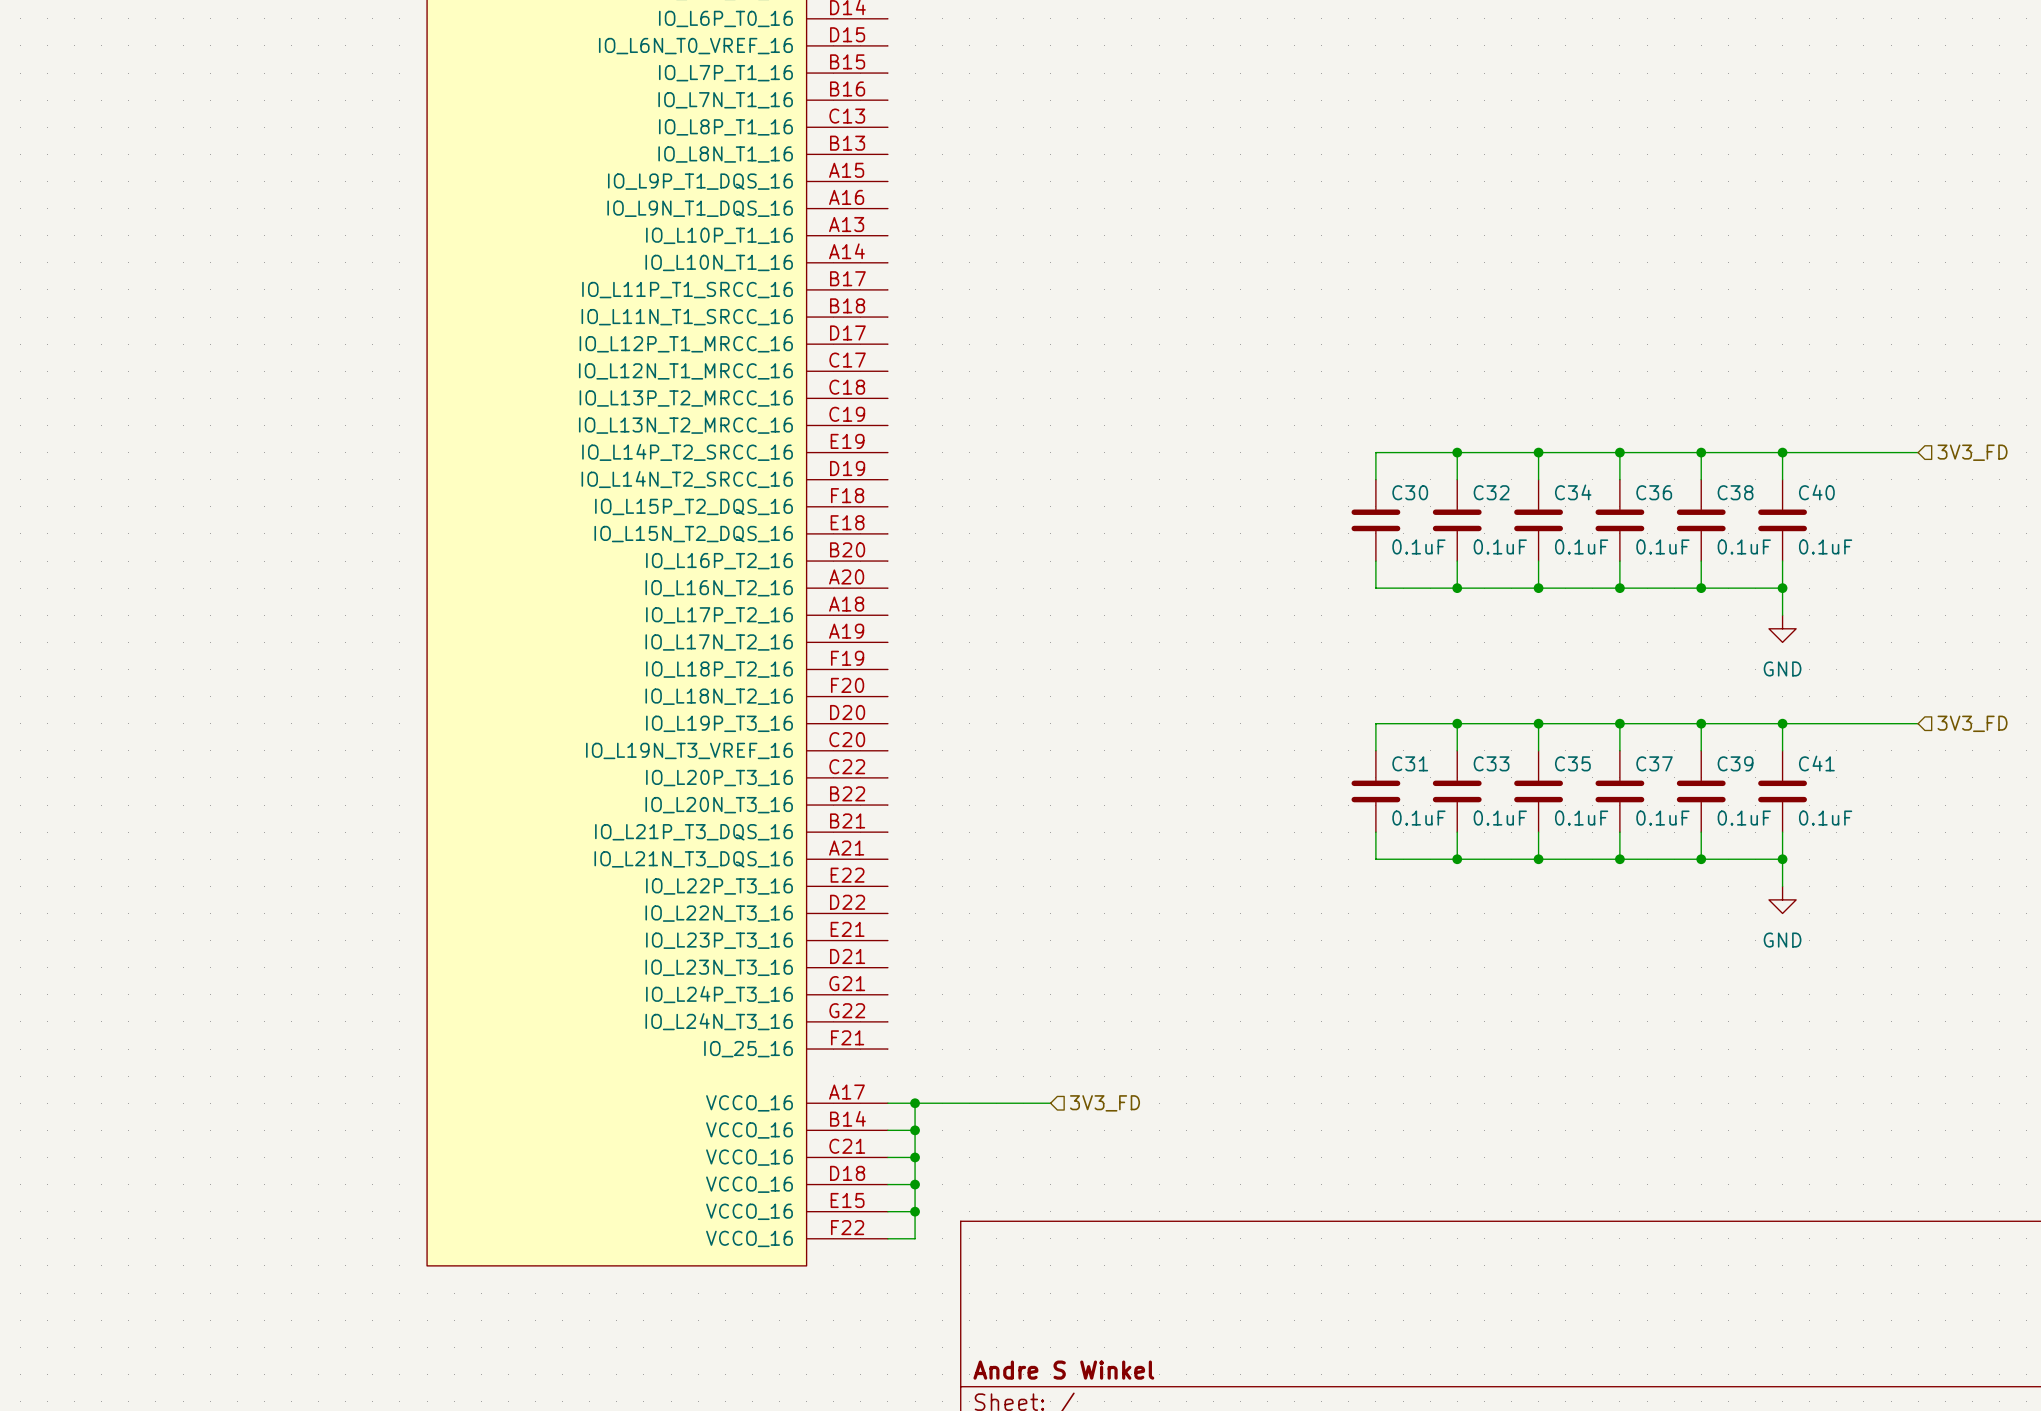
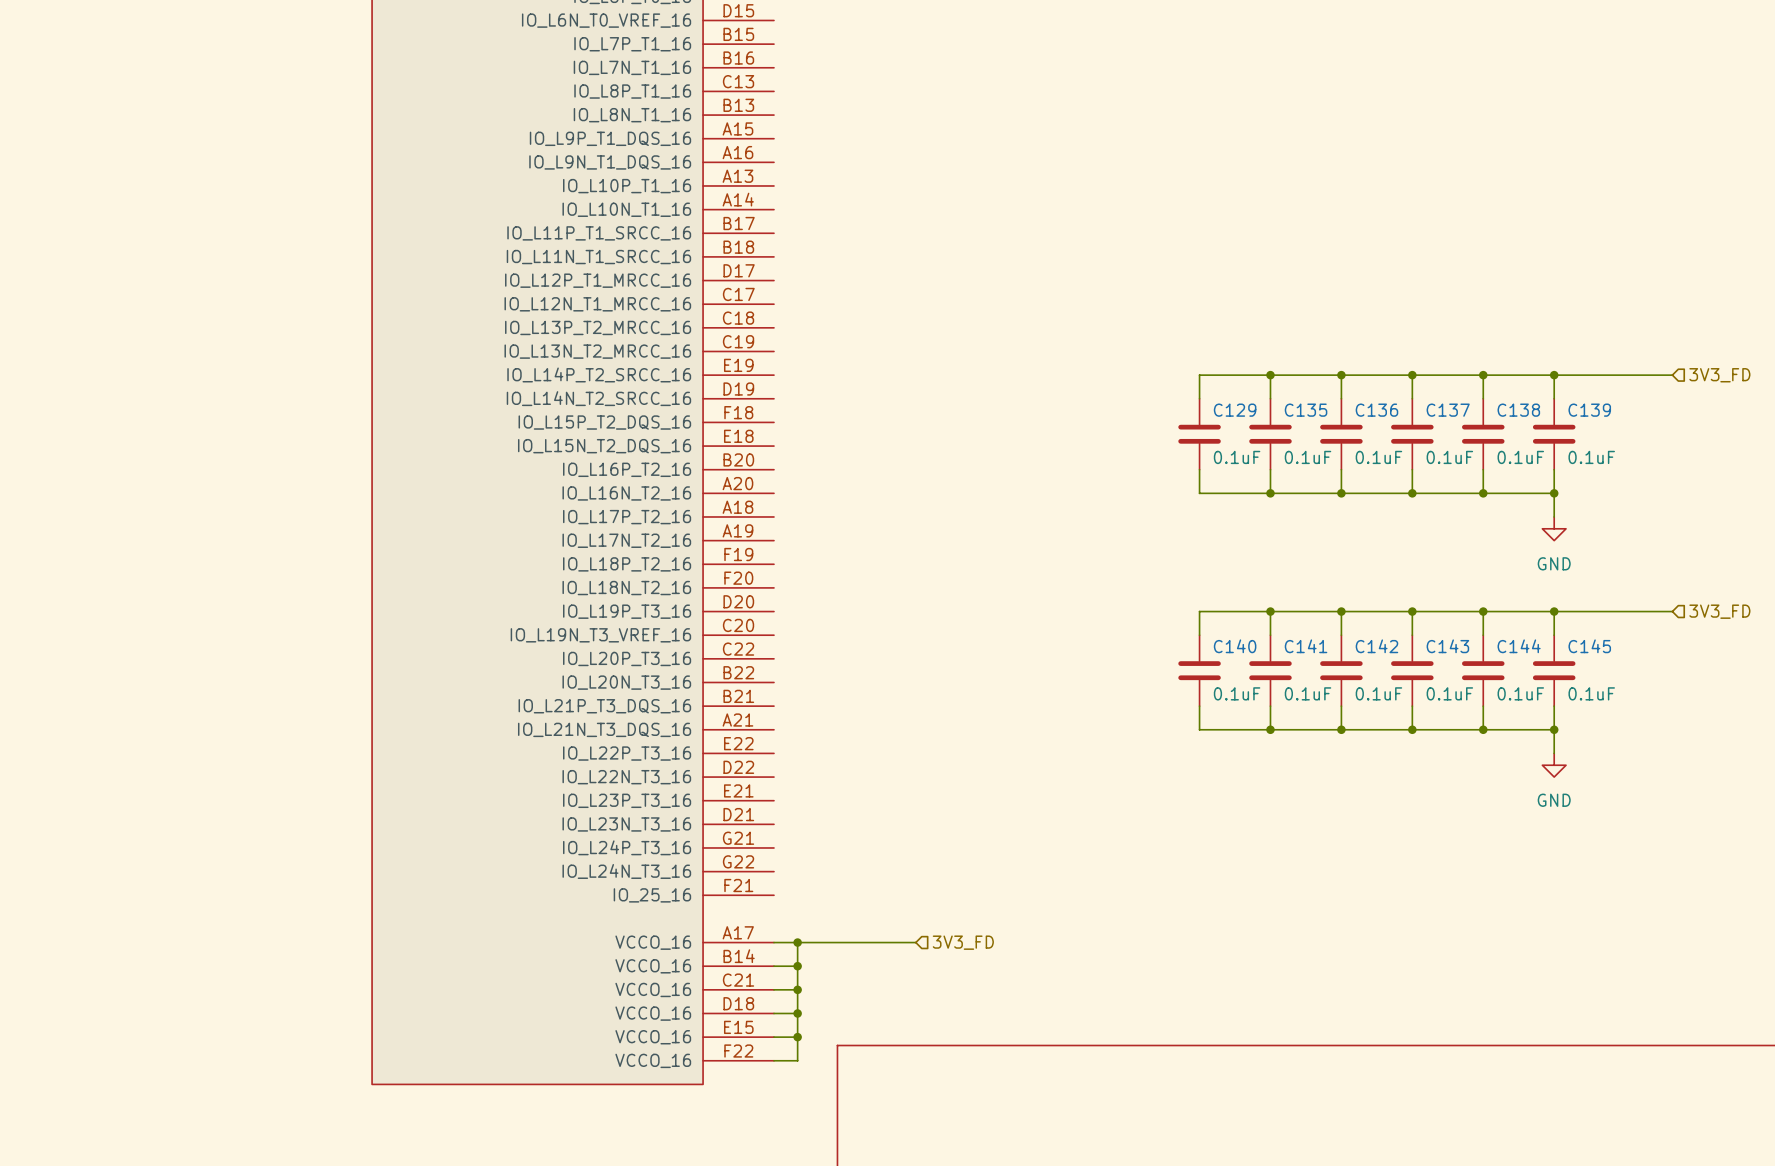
C30 name: C30 (1410, 492) -> C129 (1235, 410)
C32 name: C32 (1491, 492) -> C135 (1306, 410)
C34 name: C34 (1573, 492) -> C136 (1376, 410)
C36 name: C36 (1654, 492) -> C137 (1448, 410)
C38 name: C38 (1735, 492) -> C138 (1518, 410)
C40 name: C40 (1816, 492) -> C139 (1589, 410)
C31 name: C31 (1410, 763) -> C140 (1235, 646)
C33 name: C33 (1491, 763) -> C141 (1306, 646)
C35 name: C35 (1572, 763) -> C142 (1376, 646)
C37 name: C37 (1654, 763) -> C143 (1447, 646)
C39 name: C39 (1735, 763) -> C144 (1519, 646)
C41 name: C41 (1816, 763) -> C145 (1589, 646)

